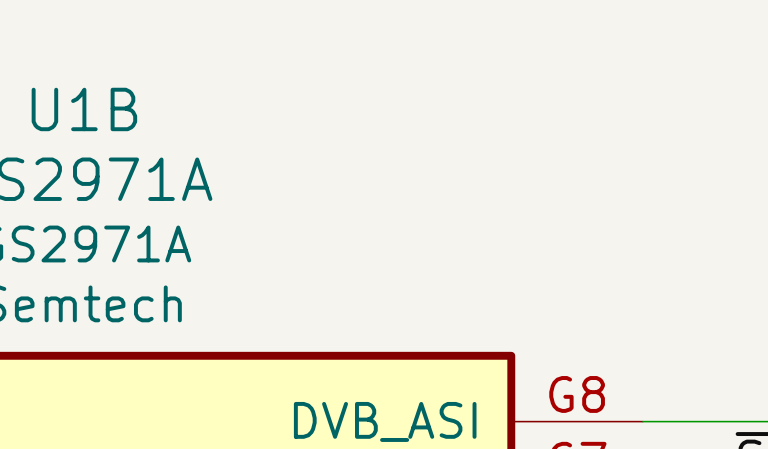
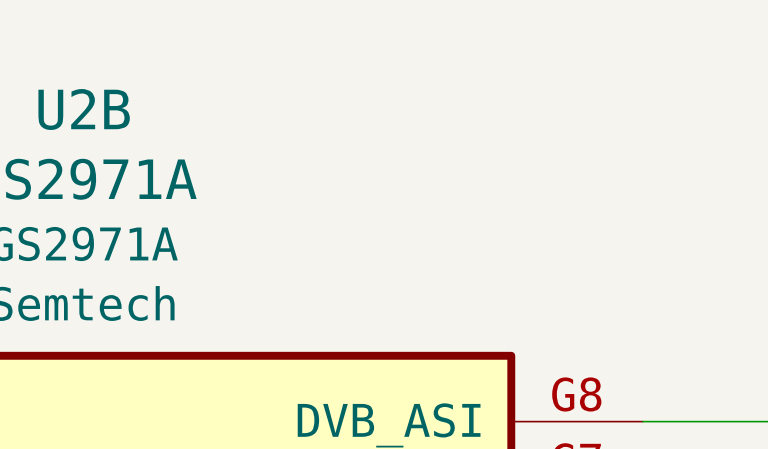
U1B name: U1B (84, 109) -> U2B (84, 109)

